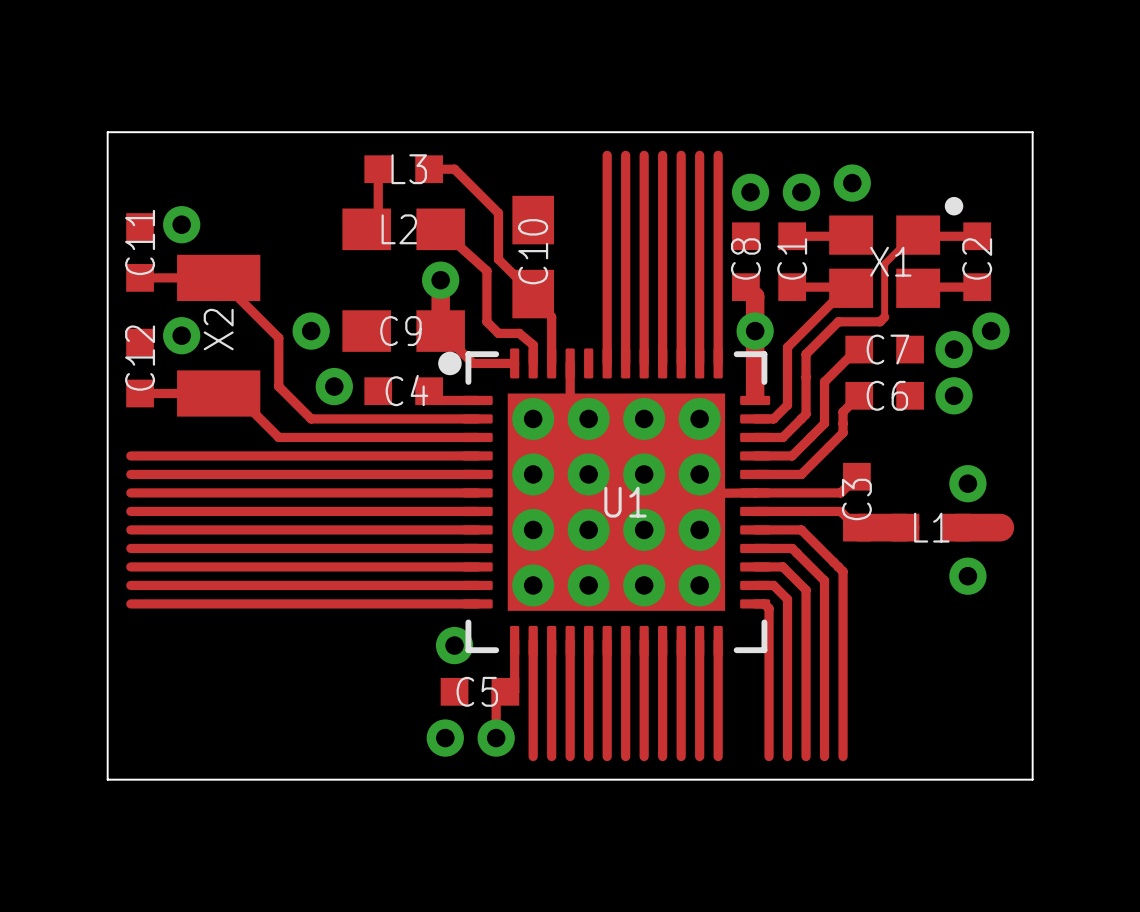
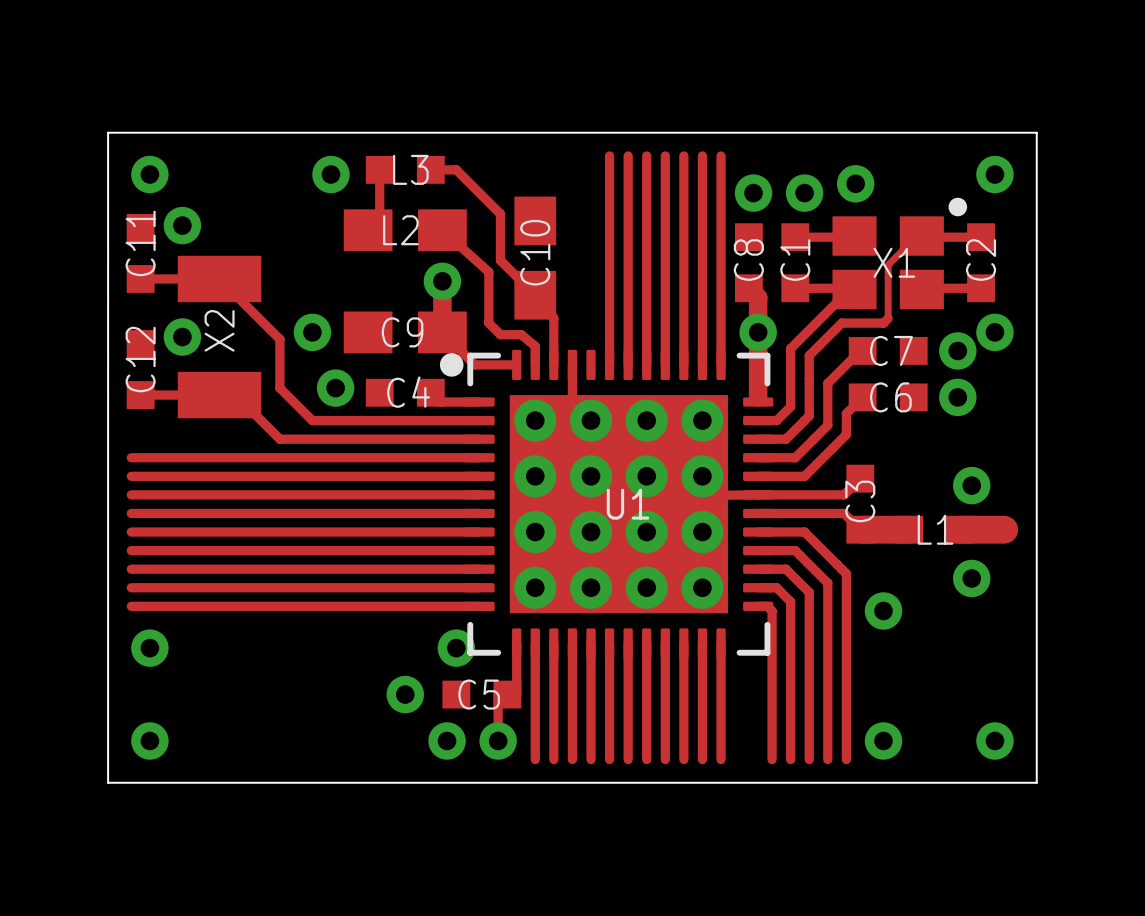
via: none -> (149, 174)
via: none -> (330, 174)
via: none -> (994, 174)
via: none -> (883, 610)
via: none -> (149, 648)
via: none -> (405, 694)
via: none -> (149, 740)
via: none -> (883, 740)
via: none -> (994, 740)

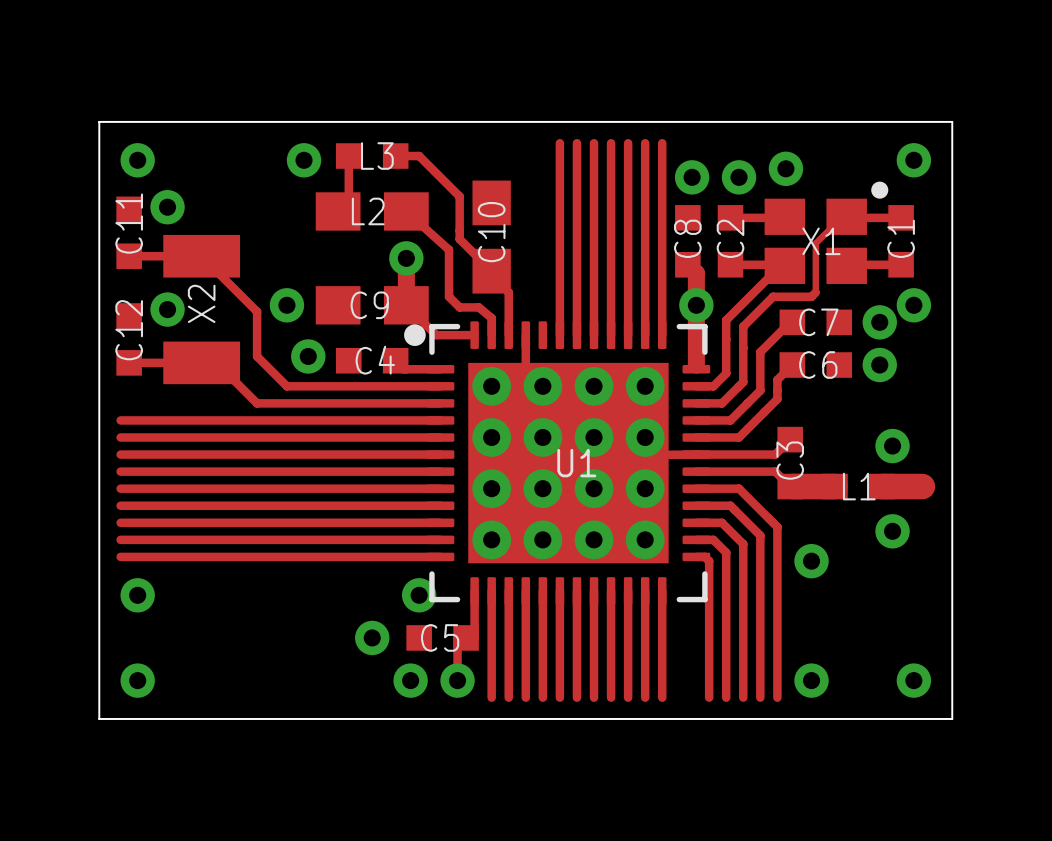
C1 name: C1 (795, 260) -> C2 (730, 238)
C2 name: C2 (981, 260) -> C1 (901, 238)

